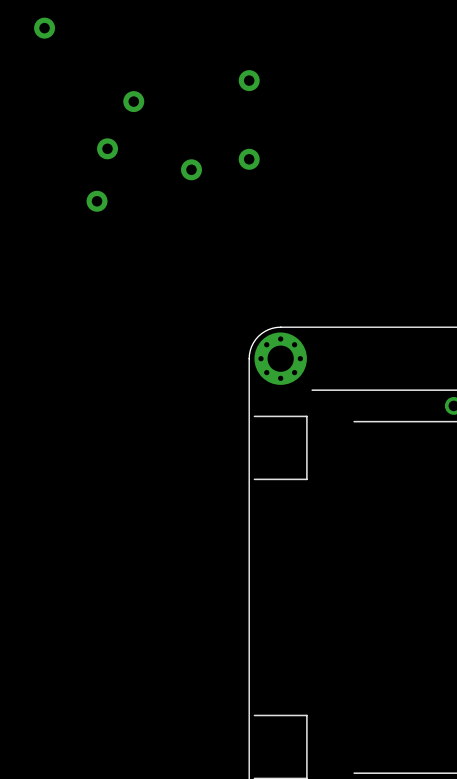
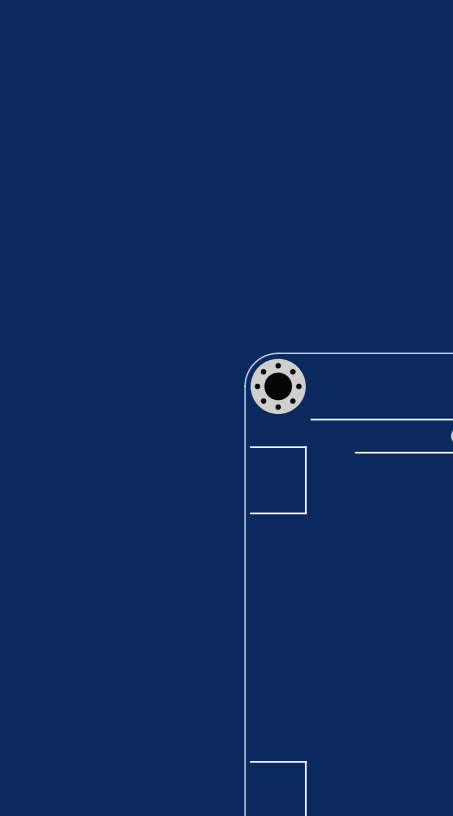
part: (44, 28) -> none
part: (249, 80) -> none
part: (133, 101) -> none
part: (107, 148) -> none
part: (249, 159) -> none
part: (191, 169) -> none
part: (97, 201) -> none

